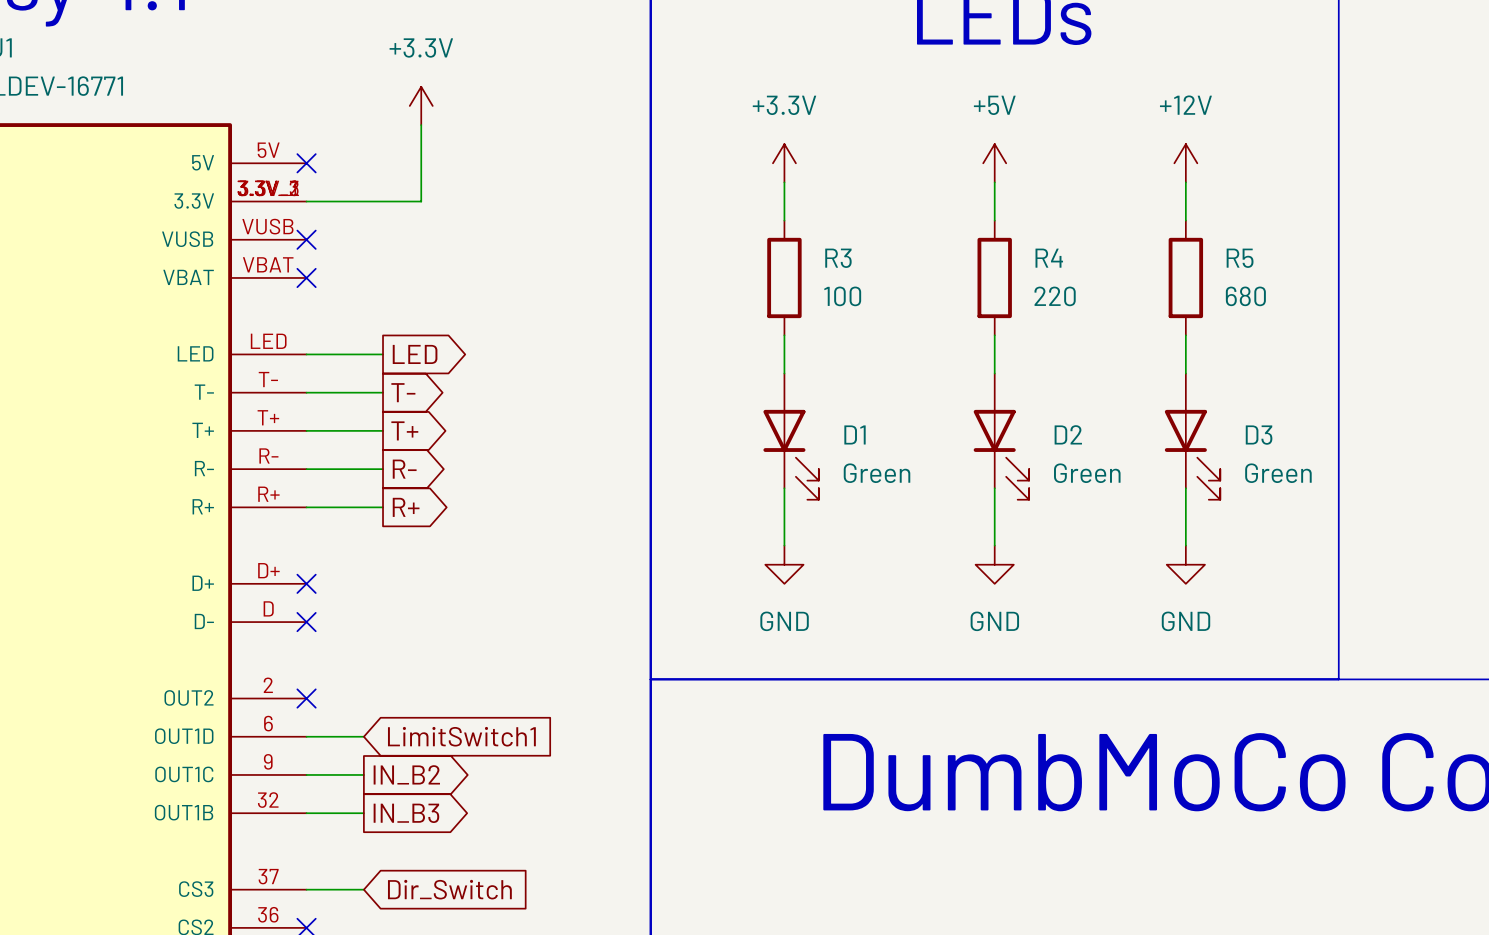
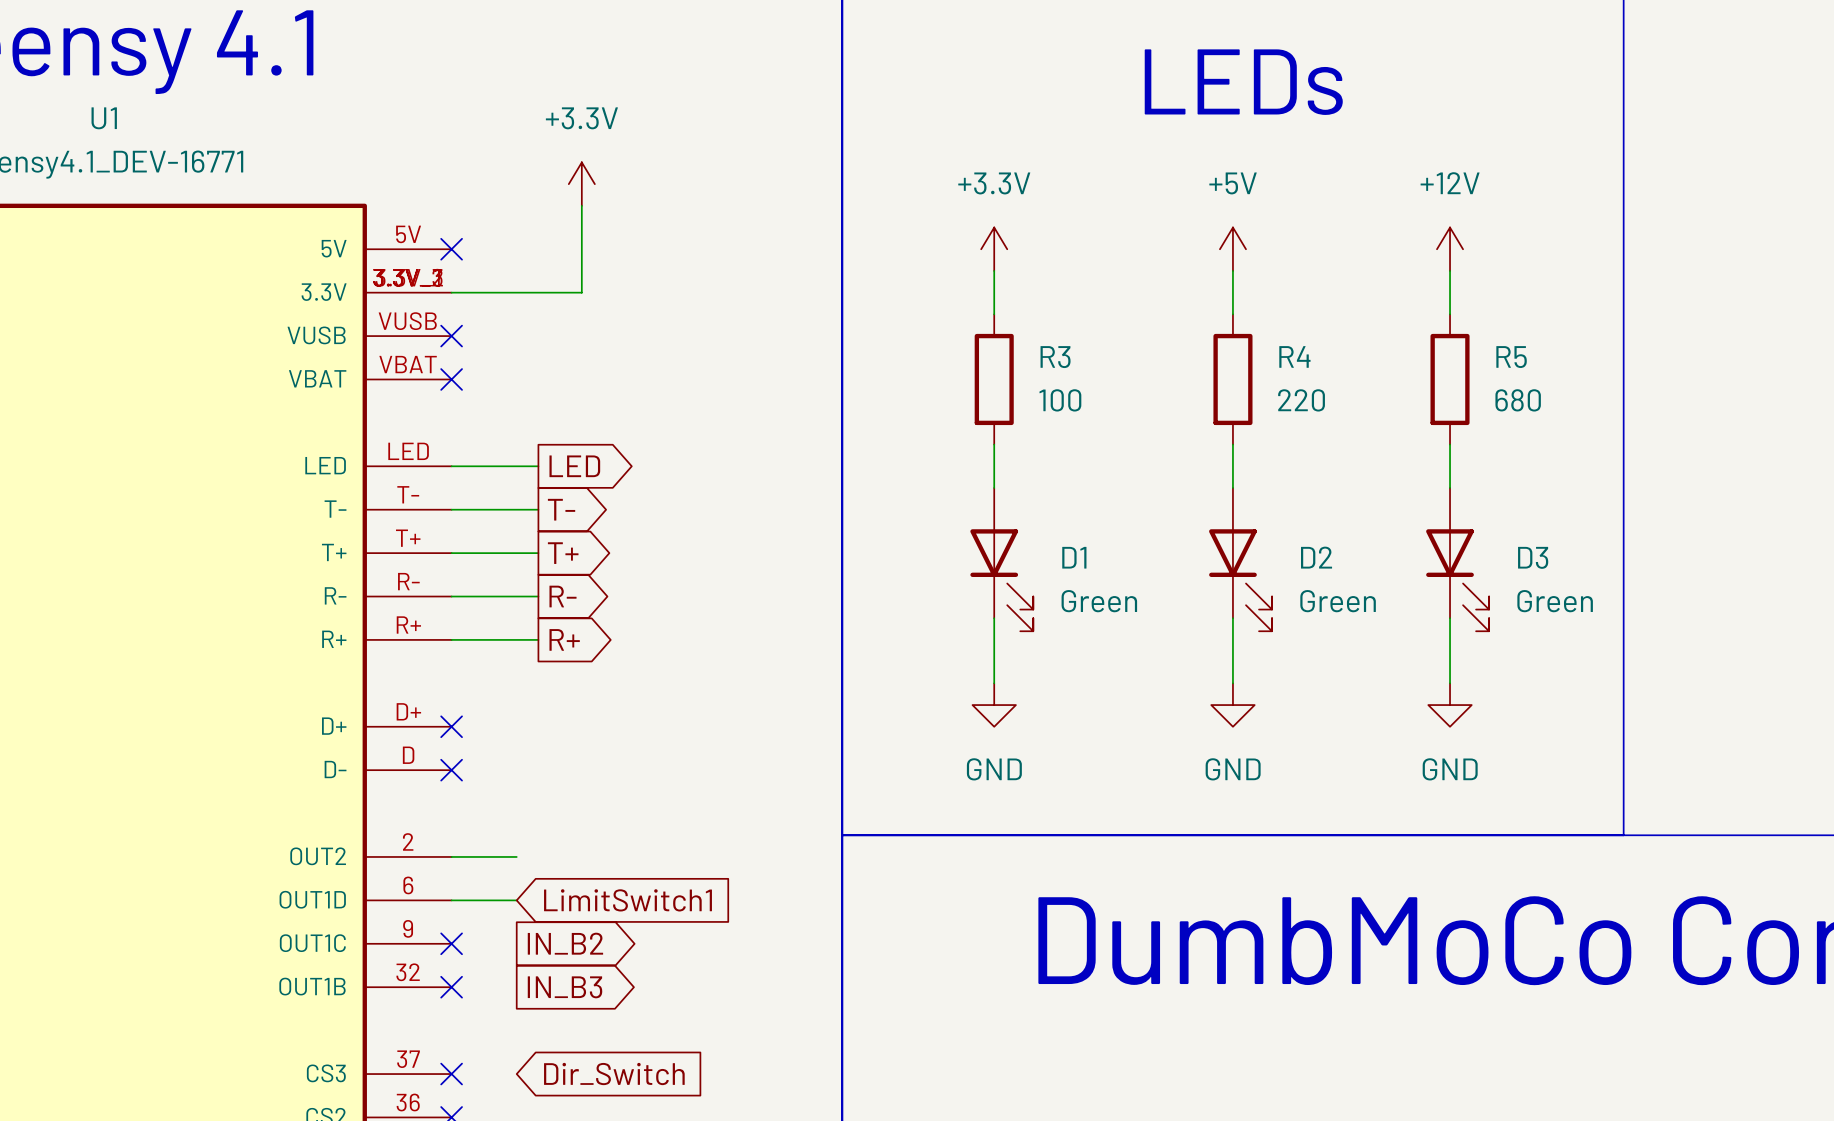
no-connect mark: (306, 698) -> none
wire: (306, 774) (363, 774) -> (451, 856) (516, 856)
no-connect mark: none -> (451, 943)
wire: (306, 813) (363, 813) -> none
no-connect mark: none -> (451, 987)
wire: (306, 889) (363, 889) -> none
no-connect mark: none -> (451, 1074)

